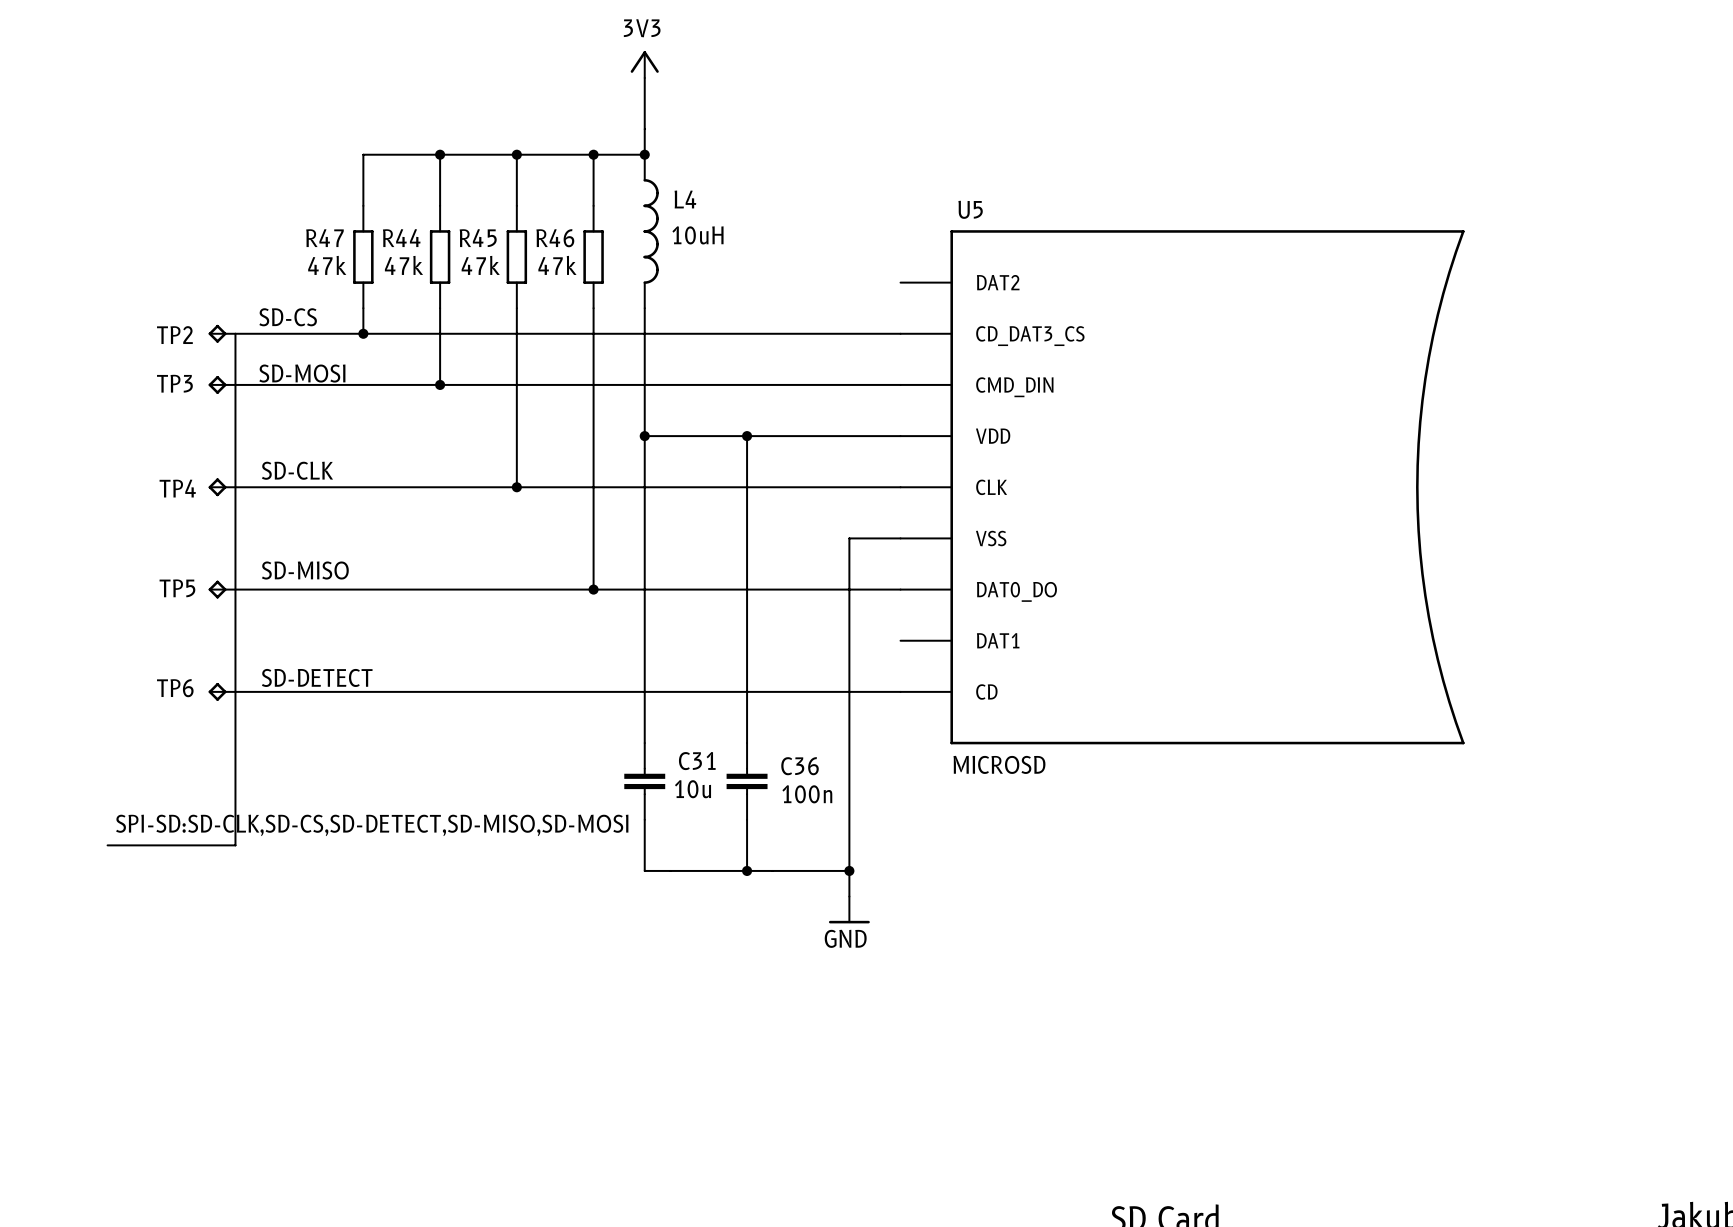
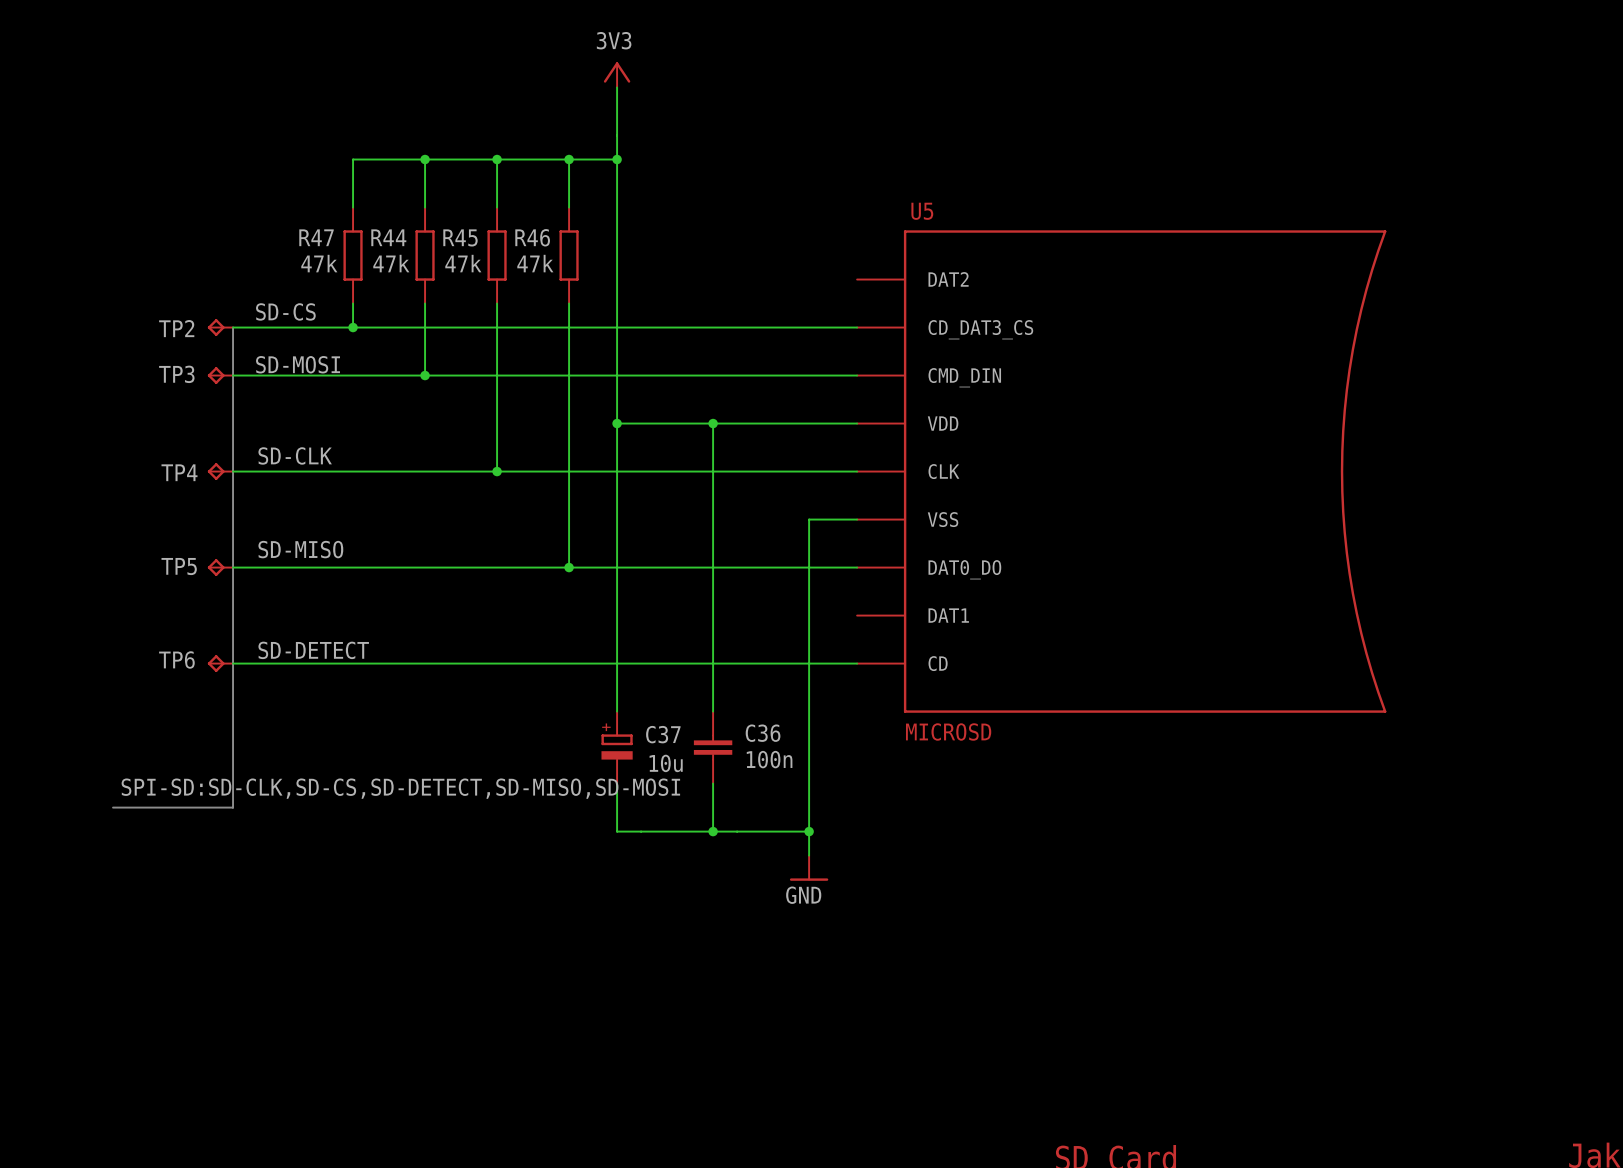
wire: none -> (617, 159) (617, 303)
L4: 10uH (651, 231) -> none
C31: 10u (644, 781) -> none
C37: none -> 10u (617, 747)

